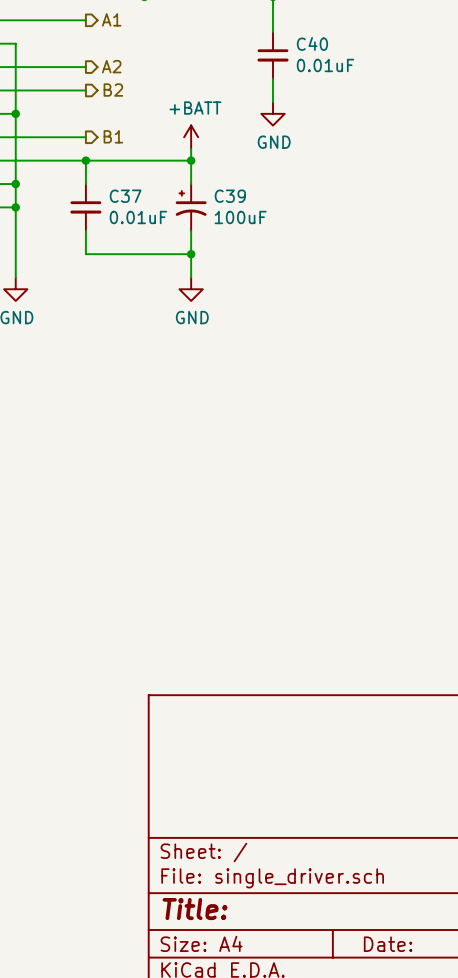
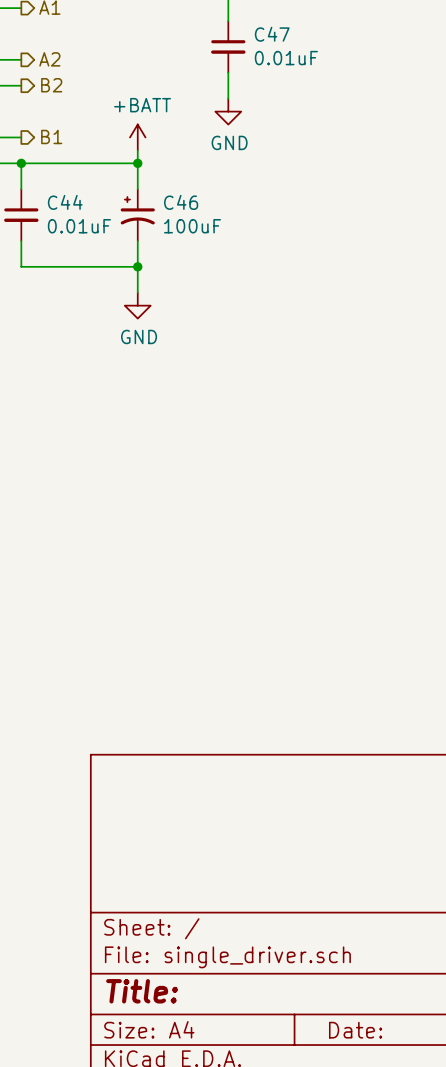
C40 name: C40 (312, 43) -> C47 (272, 34)
C37 name: C37 (125, 196) -> C44 (65, 202)
C39 name: C39 (230, 196) -> C46 (181, 202)

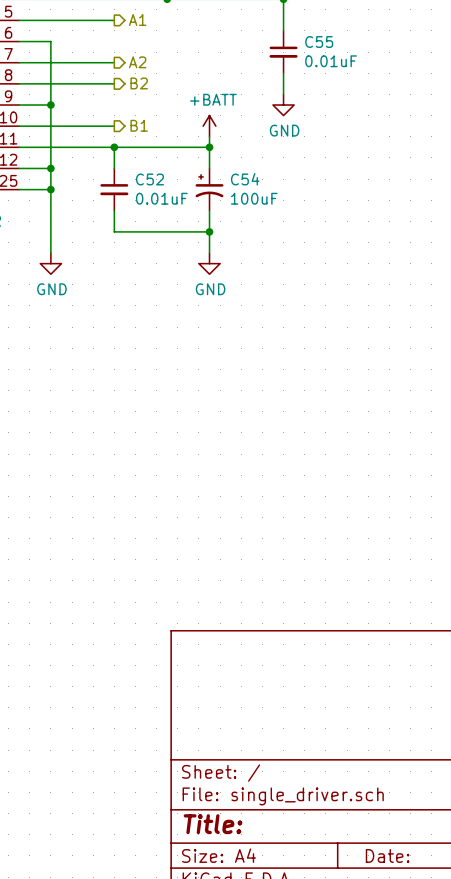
C47 name: C47 (272, 34) -> C55 (319, 42)
C44 name: C44 (65, 202) -> C52 (149, 179)
C46 name: C46 (181, 202) -> C54 (245, 179)

